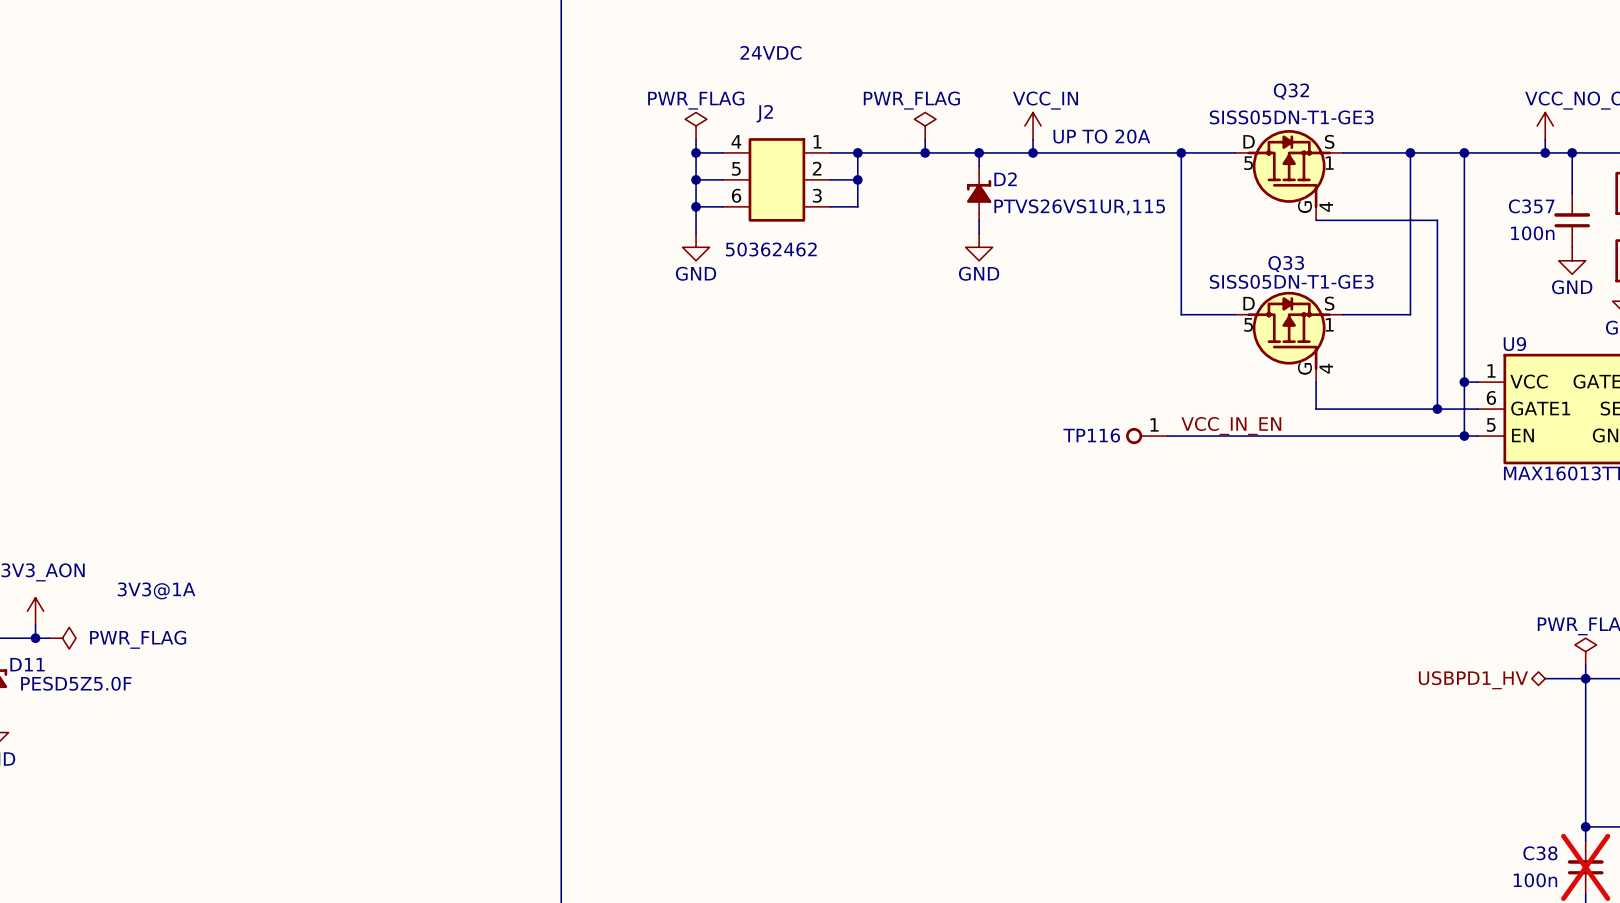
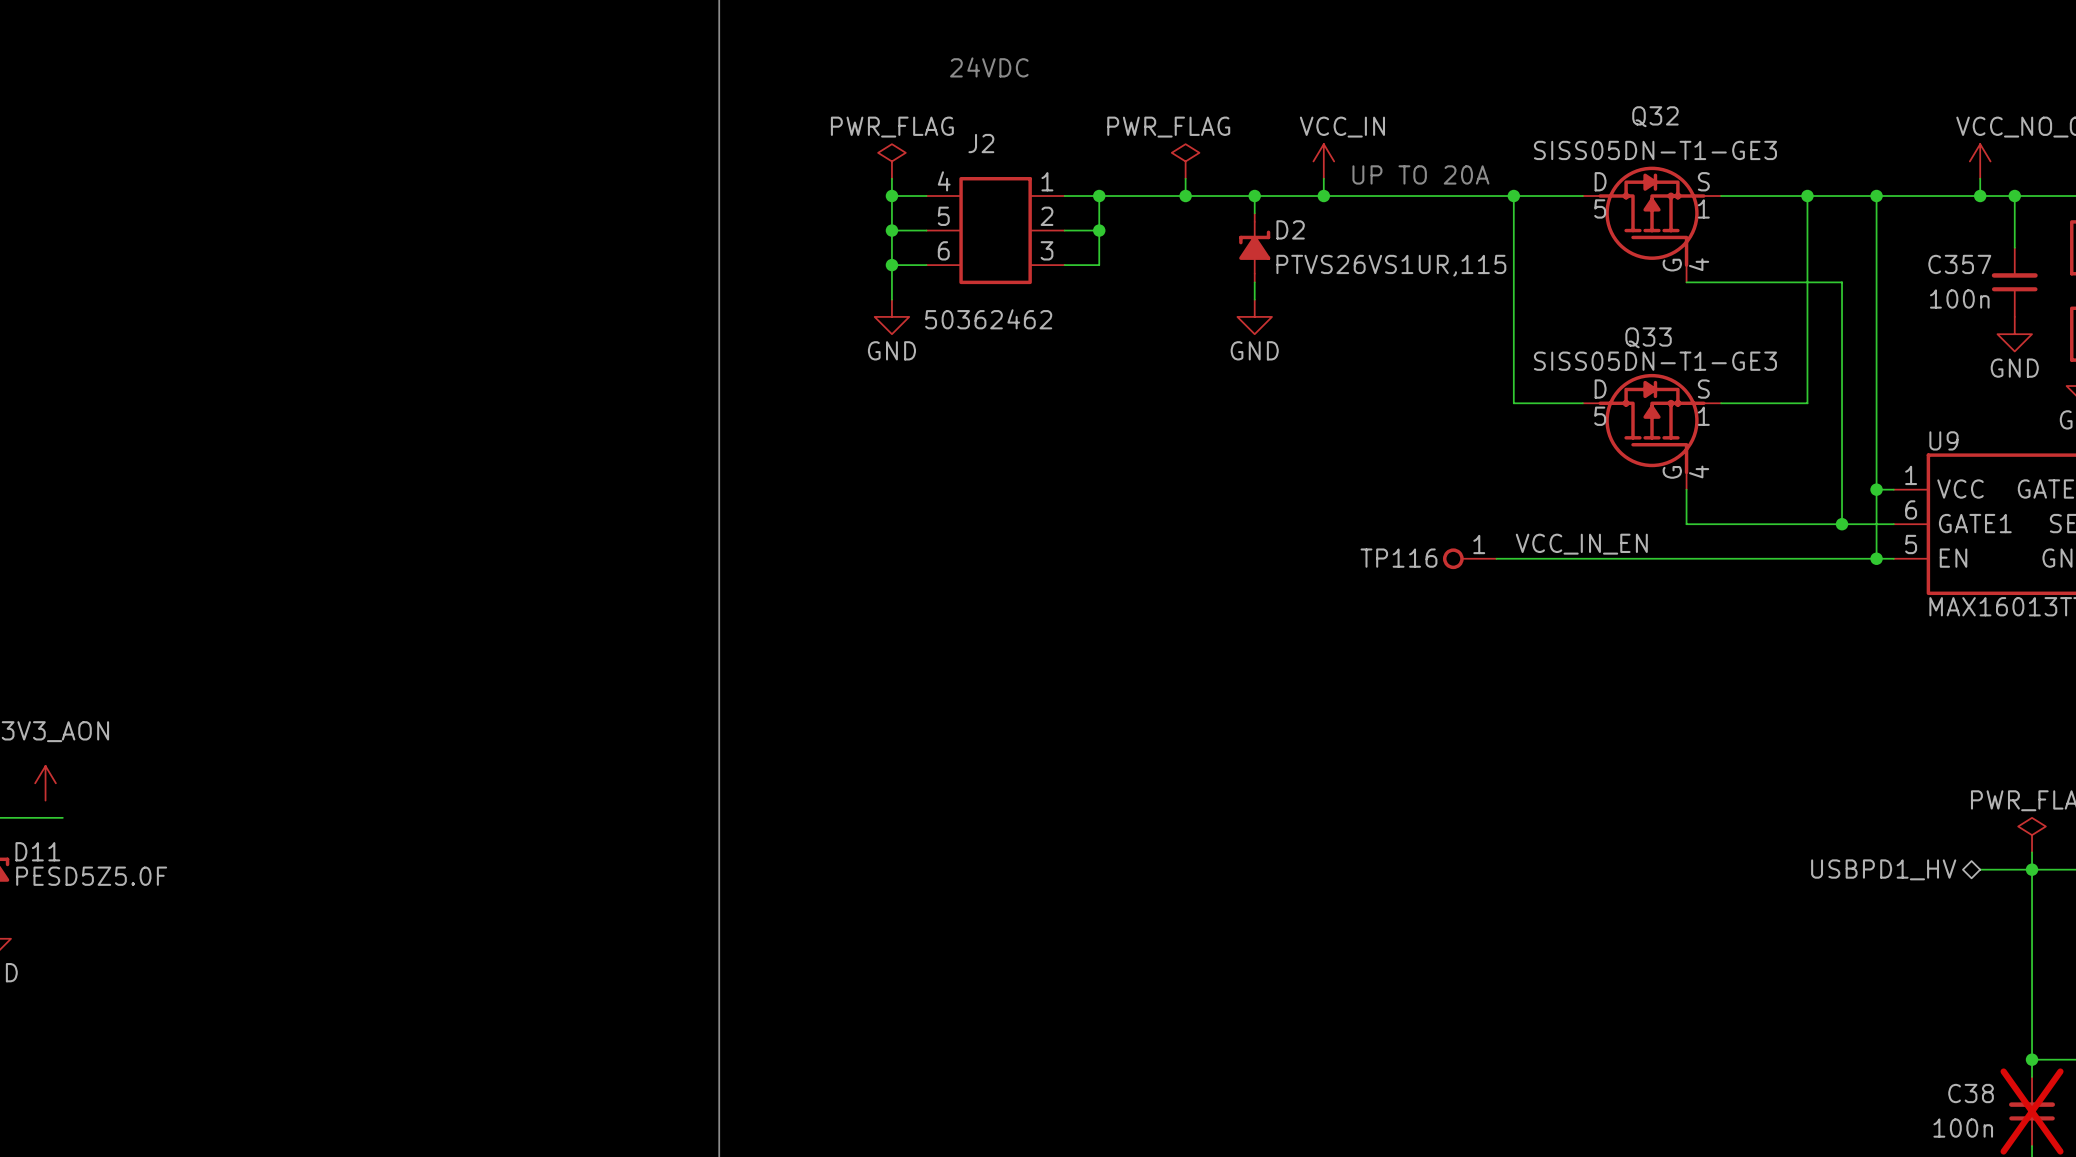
text: 3V3@1A (156, 590) -> none
wire: (35, 624) (35, 638) -> none
junction: (35, 638) -> none
power symbol: PWR_FLAG (62, 638) -> none

